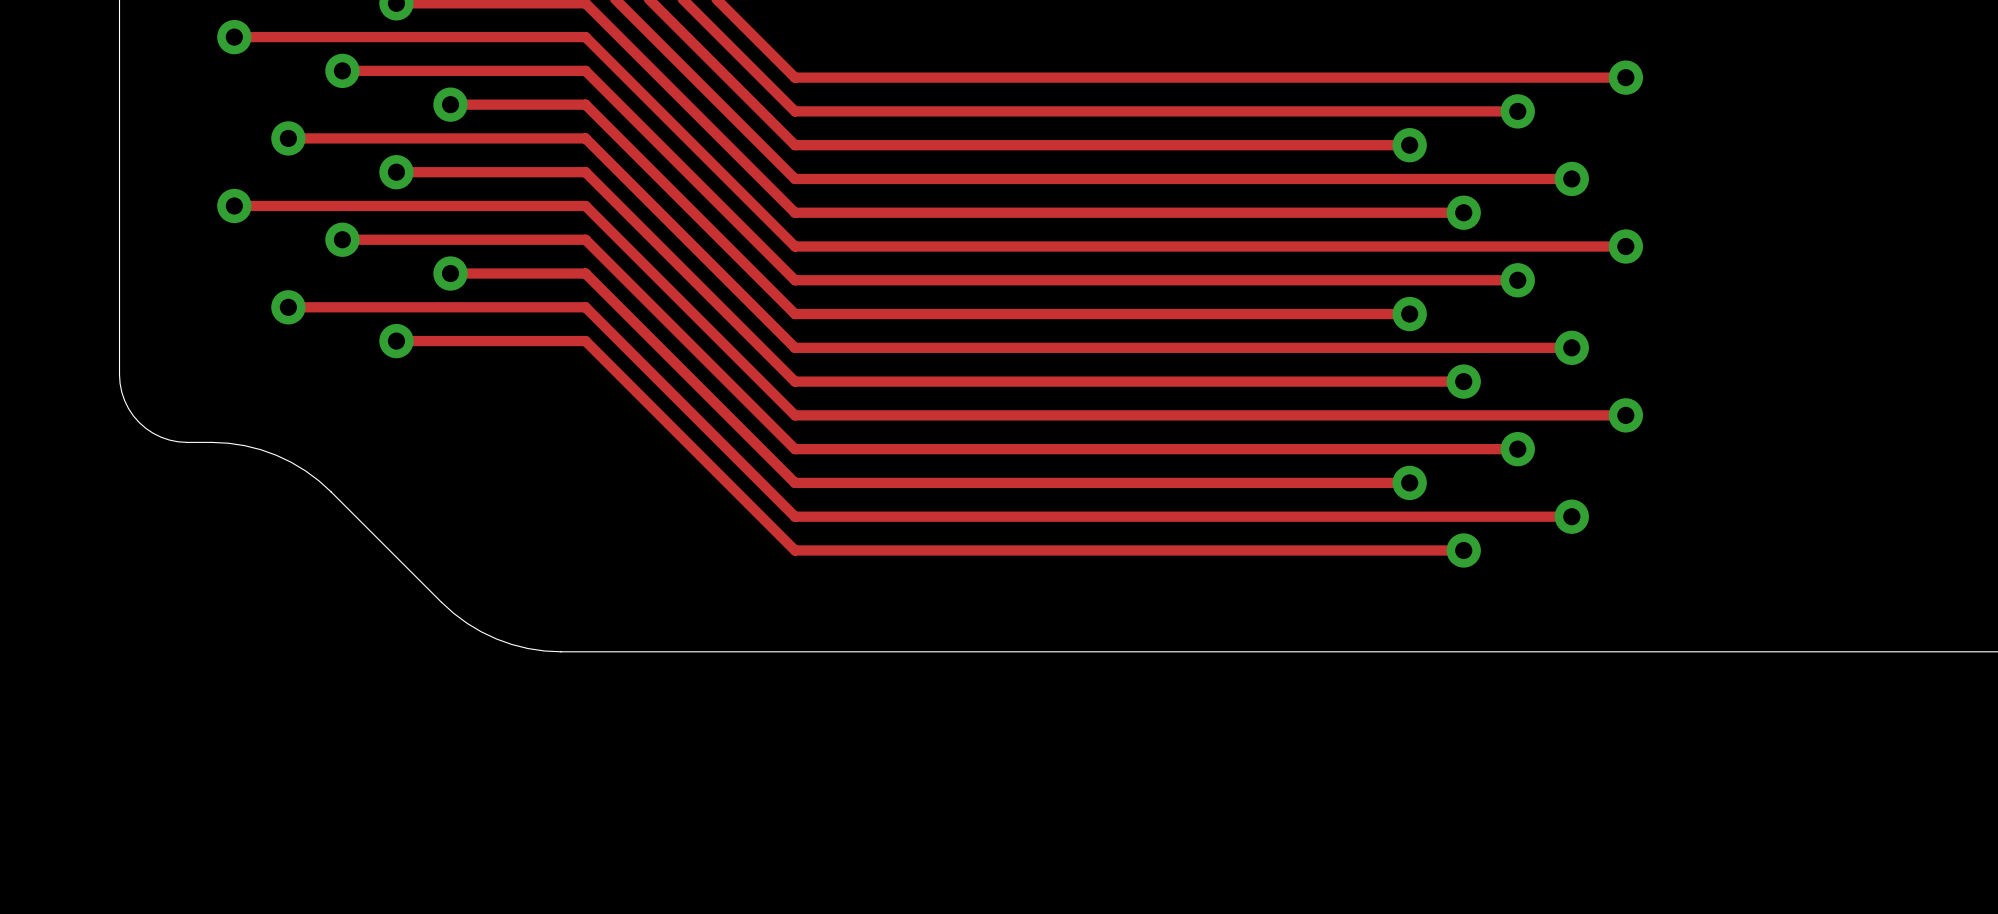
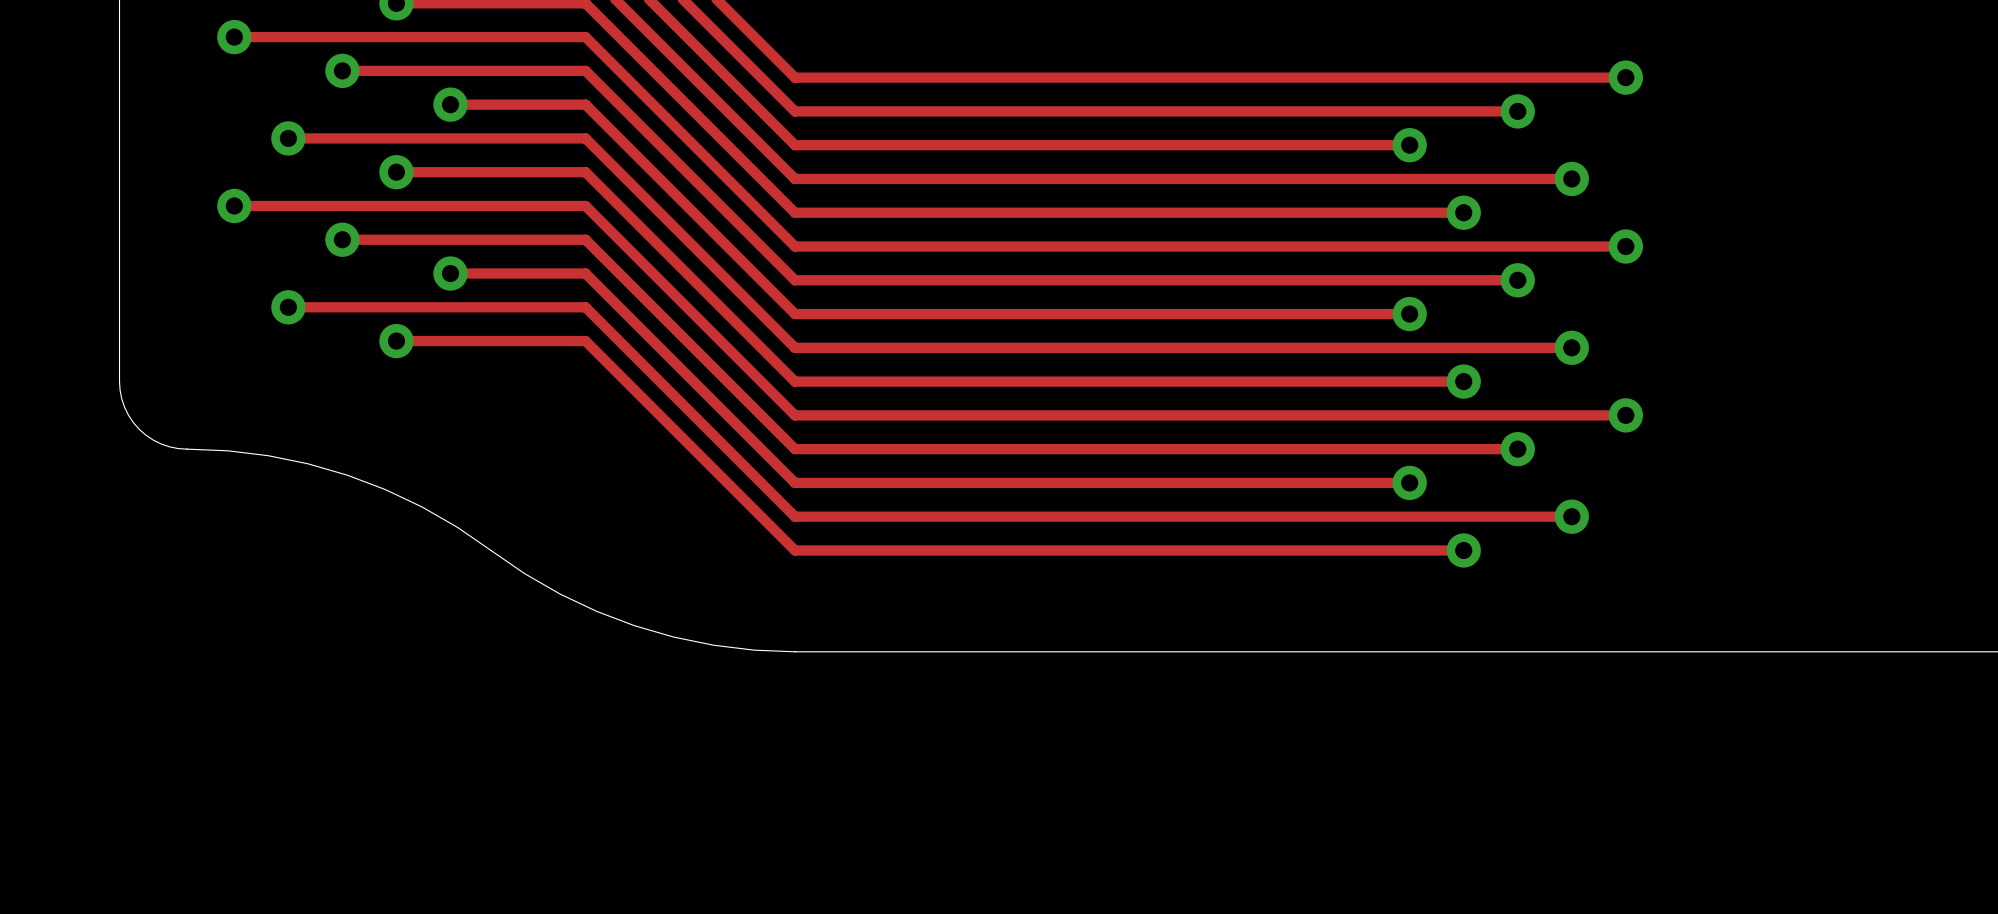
board edge: (119, 374) (124, 400) (133, 415) (145, 428) (161, 437) (178, 441) (228, 443) (260, 449) (291, 462) (305, 470) (331, 491) (453, 613) (467, 623) (496, 638) (528, 648) (560, 651) (795, 651) -> (119, 374) (121, 399) (128, 415) (145, 435) (161, 444) (178, 448) (227, 450) (268, 455) (308, 463) (347, 475) (385, 489) (422, 507) (457, 527) (524, 573) (559, 593) (596, 611) (634, 625) (673, 637) (713, 645) (754, 650) (795, 651)

